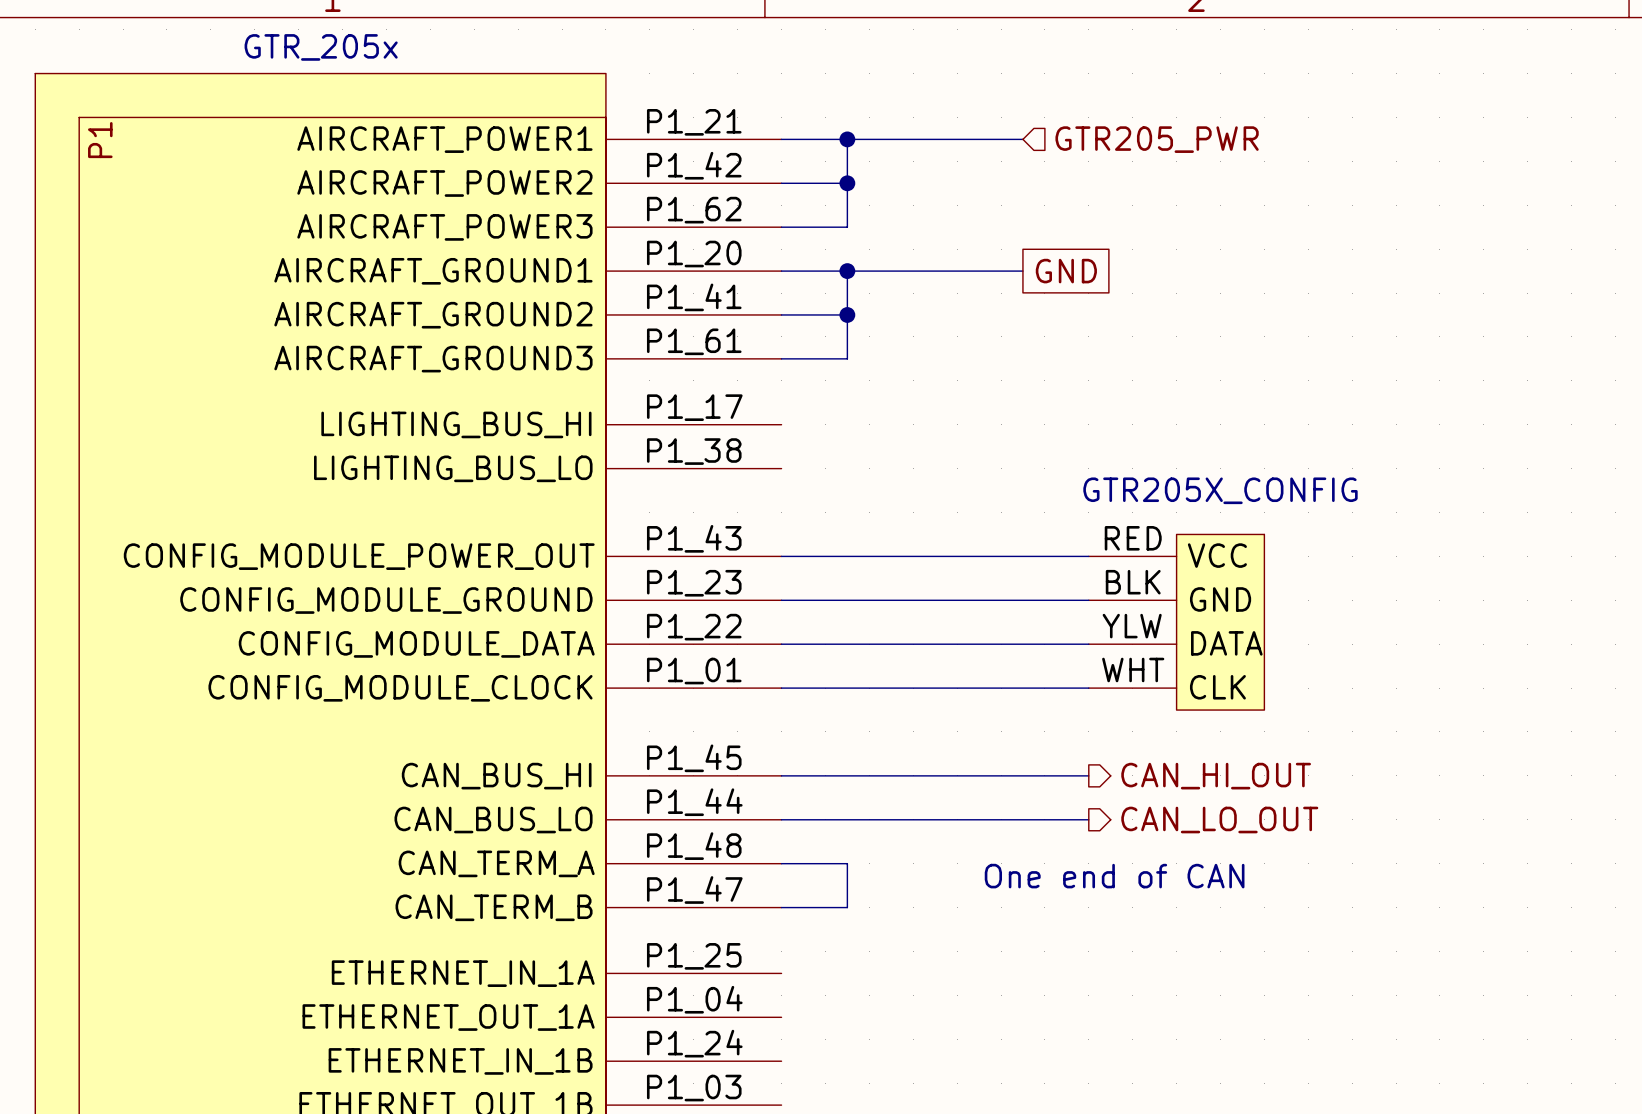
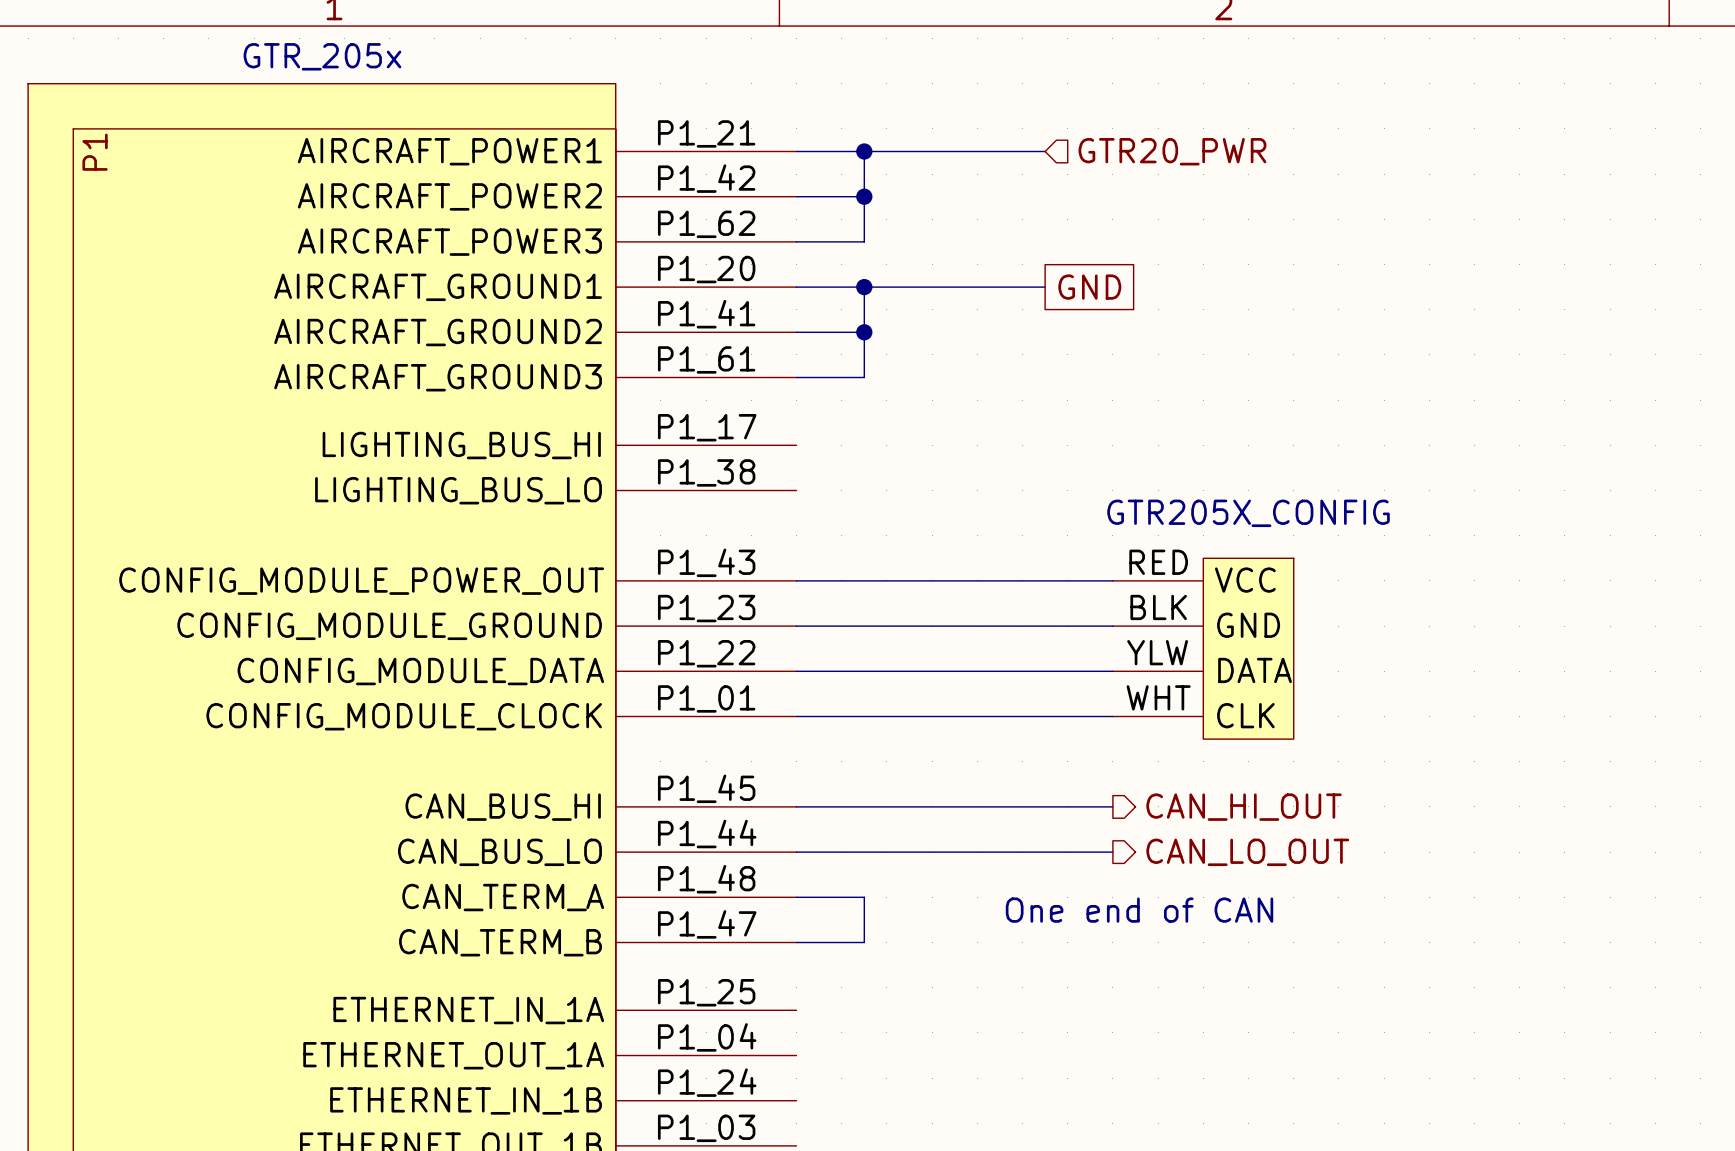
hierarchical label: GTR205_PWR (1157, 139) -> GTR20_PWR (1172, 151)

